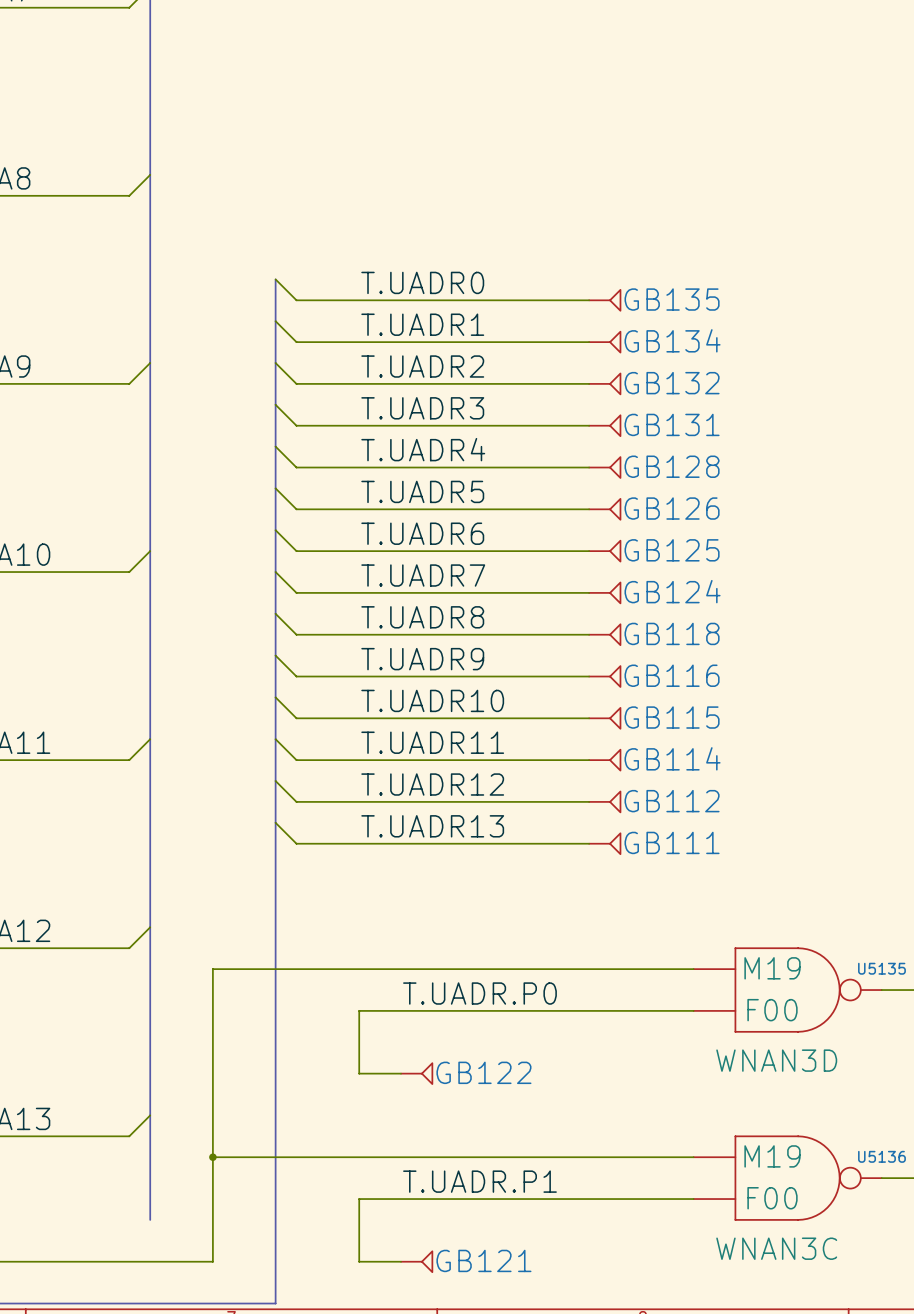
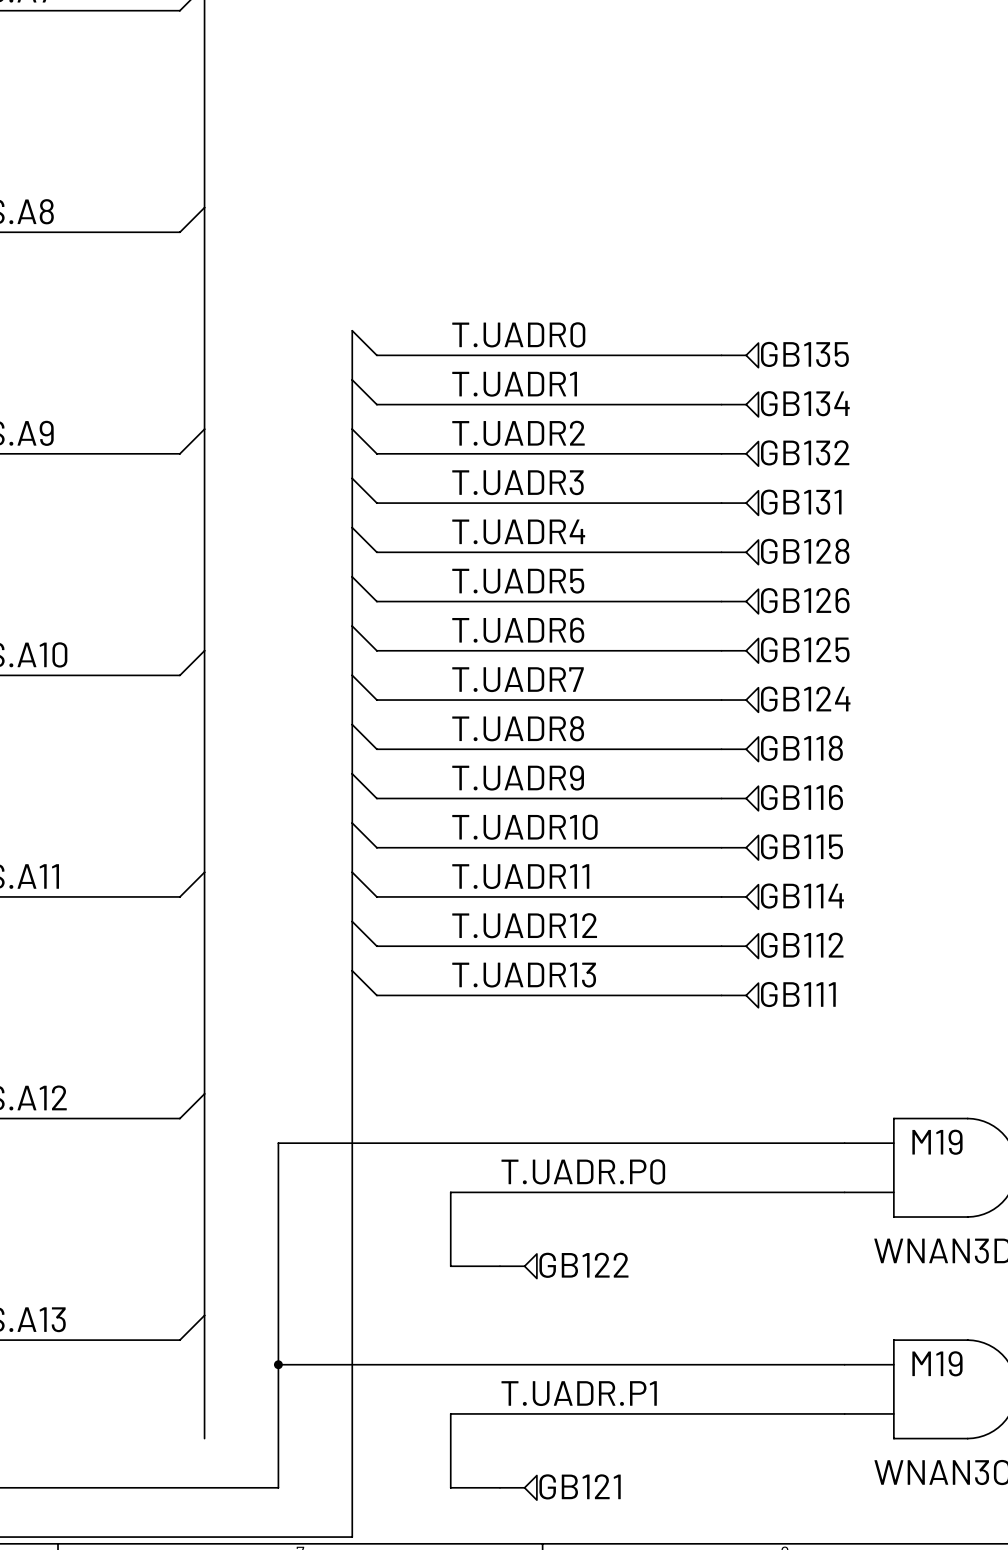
U5135 value: F00 (772, 1010) -> none
U5136 value: F00 (772, 1198) -> none

